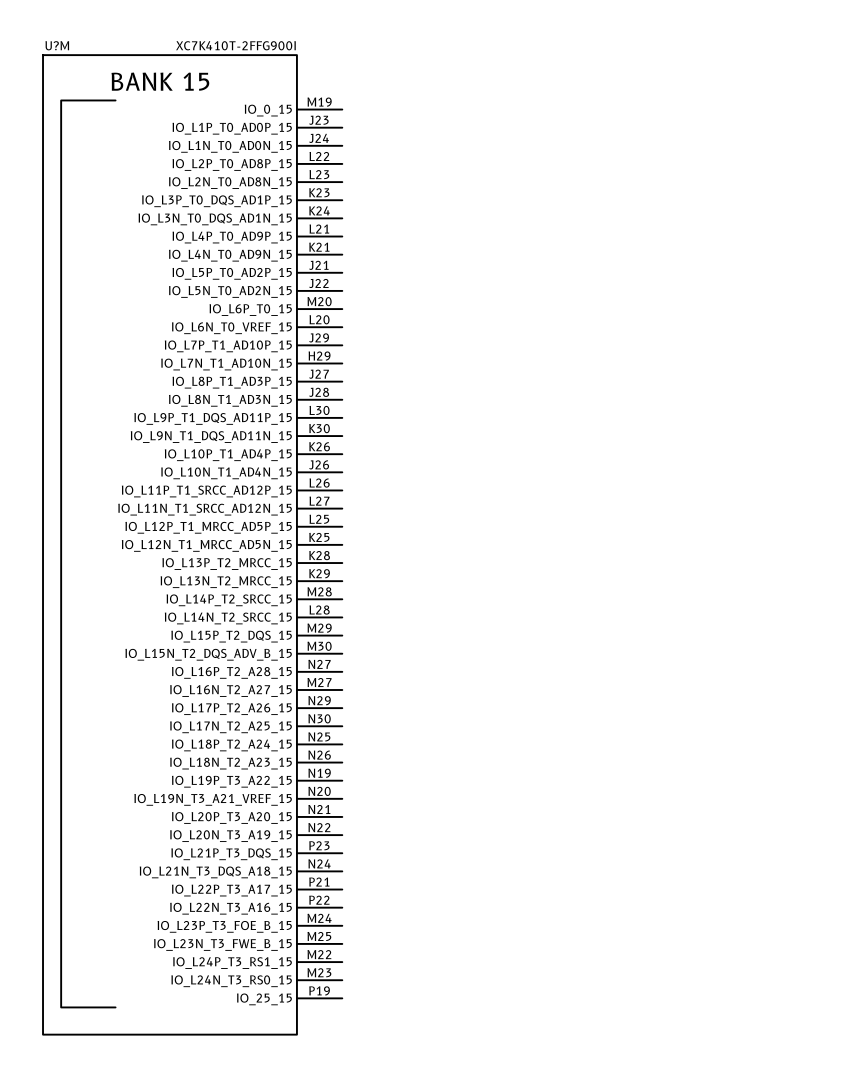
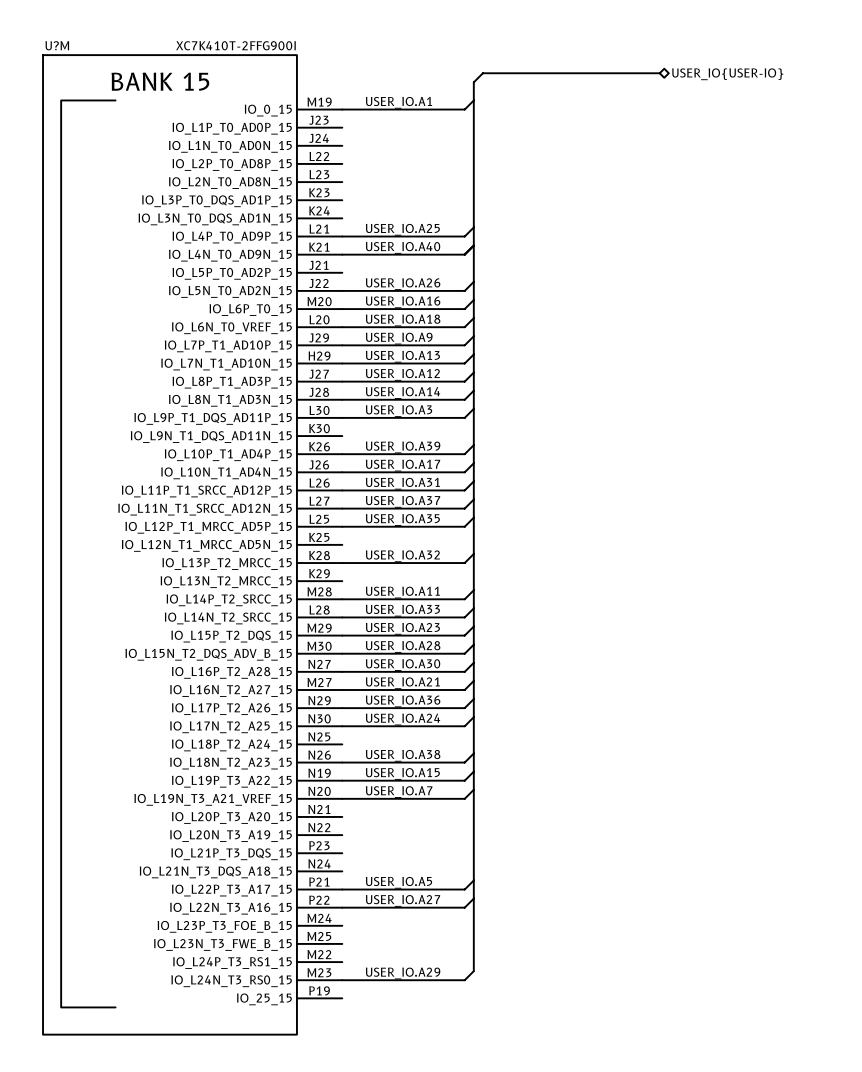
bus: none -> (659, 73) (482, 73) (473, 82) (473, 971)
hierarchical label: none -> USER_IO{USER-IO} (727, 74)
wire: none -> (473, 100) (464, 109) (342, 109)
label: none -> USER_IO.A1 (398, 102)
wire: none -> (473, 227) (464, 236) (342, 236)
label: none -> USER_IO.A25 (402, 229)
wire: none -> (473, 245) (464, 254) (342, 254)
label: none -> USER_IO.A40 (403, 247)
wire: none -> (473, 281) (464, 290) (342, 290)
label: none -> USER_IO.A26 (403, 284)
wire: none -> (473, 300) (464, 309) (342, 309)
label: none -> USER_IO.A16 (403, 302)
wire: none -> (473, 318) (464, 327) (342, 327)
label: none -> USER_IO.A18 (403, 320)
wire: none -> (473, 336) (464, 345) (342, 345)
label: none -> USER_IO.A9 (399, 338)
wire: none -> (473, 354) (464, 363) (342, 363)
label: none -> USER_IO.A13 (402, 356)
wire: none -> (473, 372) (464, 381) (342, 381)
label: none -> USER_IO.A12 (402, 374)
wire: none -> (473, 390) (464, 399) (342, 399)
label: none -> USER_IO.A14 (403, 393)
wire: none -> (473, 408) (464, 417) (342, 417)
label: none -> USER_IO.A3 (399, 411)
wire: none -> (473, 445) (464, 454) (342, 454)
label: none -> USER_IO.A39 (403, 447)
wire: none -> (473, 463) (464, 472) (342, 472)
label: none -> USER_IO.A17 (403, 465)
wire: none -> (473, 481) (464, 490) (342, 490)
label: none -> USER_IO.A31 (402, 483)
wire: none -> (473, 499) (464, 508) (342, 508)
label: none -> USER_IO.A37 (403, 501)
wire: none -> (473, 517) (464, 526) (342, 526)
label: none -> USER_IO.A35 (402, 520)
wire: none -> (473, 553) (464, 563) (342, 563)
label: none -> USER_IO.A32 (402, 556)
wire: none -> (473, 590) (464, 599) (342, 599)
label: none -> USER_IO.A11 (402, 592)
wire: none -> (473, 608) (464, 617) (342, 617)
label: none -> USER_IO.A33 (402, 610)
wire: none -> (473, 626) (464, 635) (342, 635)
label: none -> USER_IO.A23 (402, 628)
wire: none -> (473, 644) (464, 653) (342, 653)
label: none -> USER_IO.A28 (403, 646)
wire: none -> (473, 662) (464, 671) (342, 671)
label: none -> USER_IO.A30 (403, 665)
wire: none -> (473, 680) (464, 689) (342, 689)
label: none -> USER_IO.A21 (402, 683)
wire: none -> (473, 699) (464, 708) (342, 708)
label: none -> USER_IO.A36 (403, 701)
wire: none -> (473, 717) (464, 726) (342, 726)
label: none -> USER_IO.A24 (403, 719)
wire: none -> (473, 753) (464, 762) (342, 762)
label: none -> USER_IO.A38 (403, 755)
wire: none -> (473, 771) (464, 780) (342, 780)
label: none -> USER_IO.A15 (402, 773)
wire: none -> (473, 789) (464, 798) (342, 798)
label: none -> USER_IO.A7 (399, 792)
wire: none -> (473, 880) (464, 889) (342, 889)
label: none -> USER_IO.A5 (398, 882)
wire: none -> (473, 898) (464, 907) (342, 907)
label: none -> USER_IO.A27 (403, 900)
wire: none -> (473, 971) (464, 980) (342, 980)
label: none -> USER_IO.A29 (403, 973)

